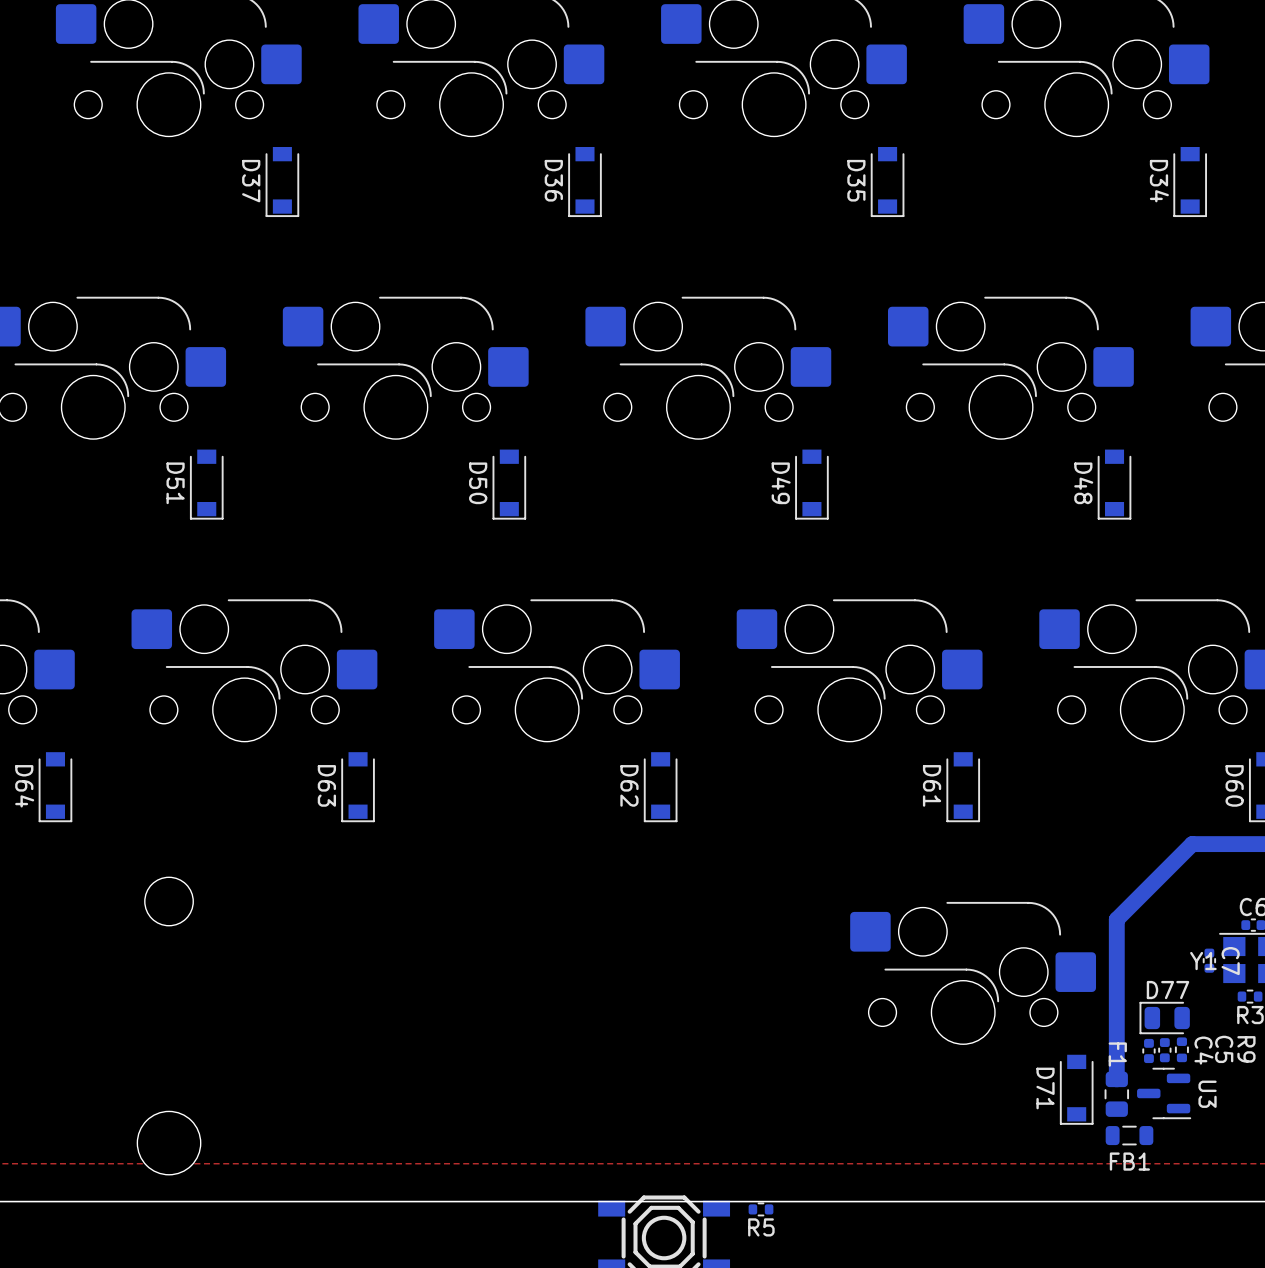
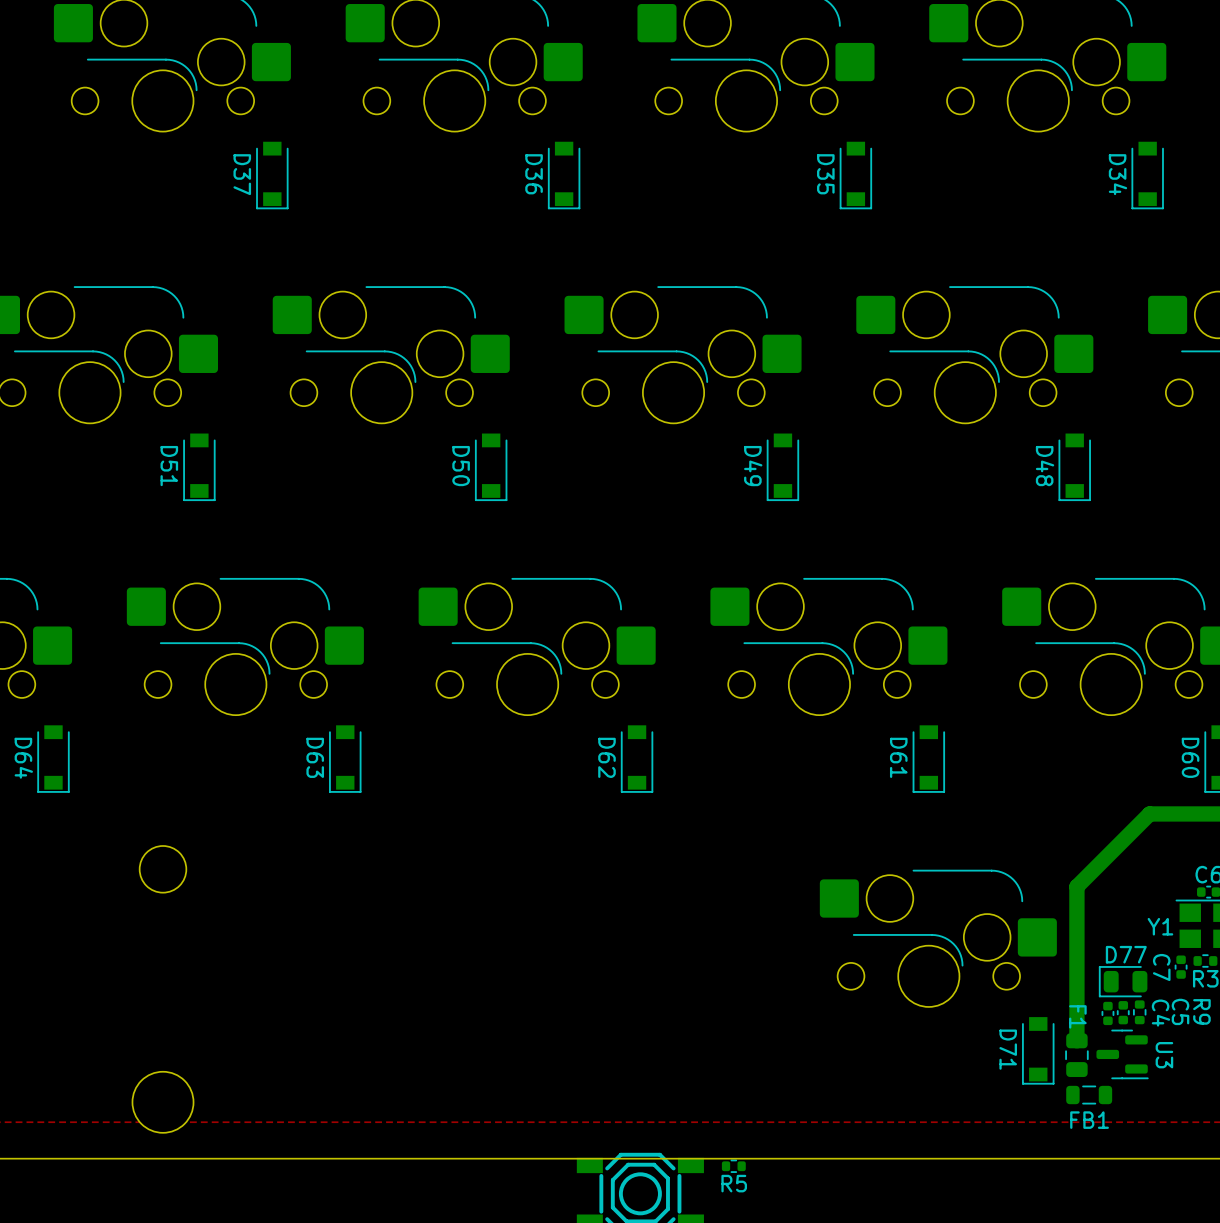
C7 position: (1209, 960) -> (1181, 967)
C7 name position: C7 (1230, 961) -> C7 (1161, 967)

